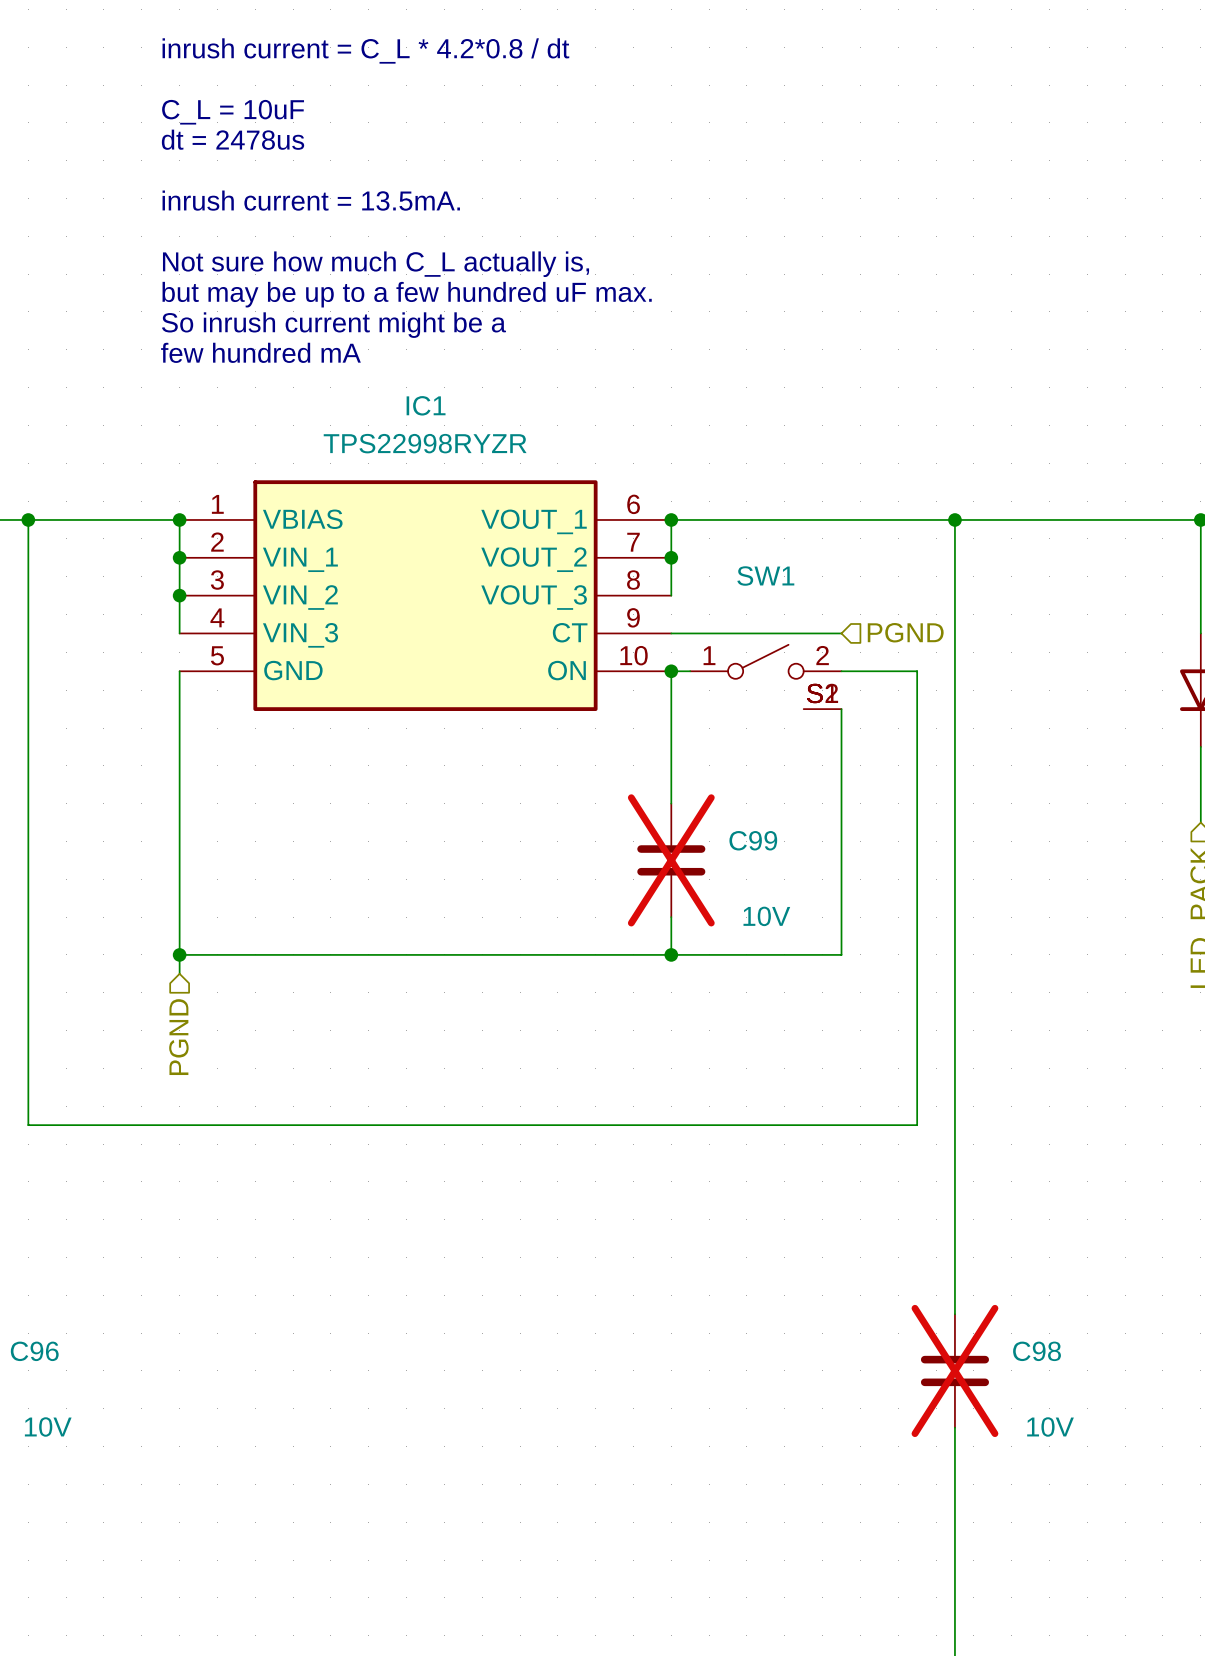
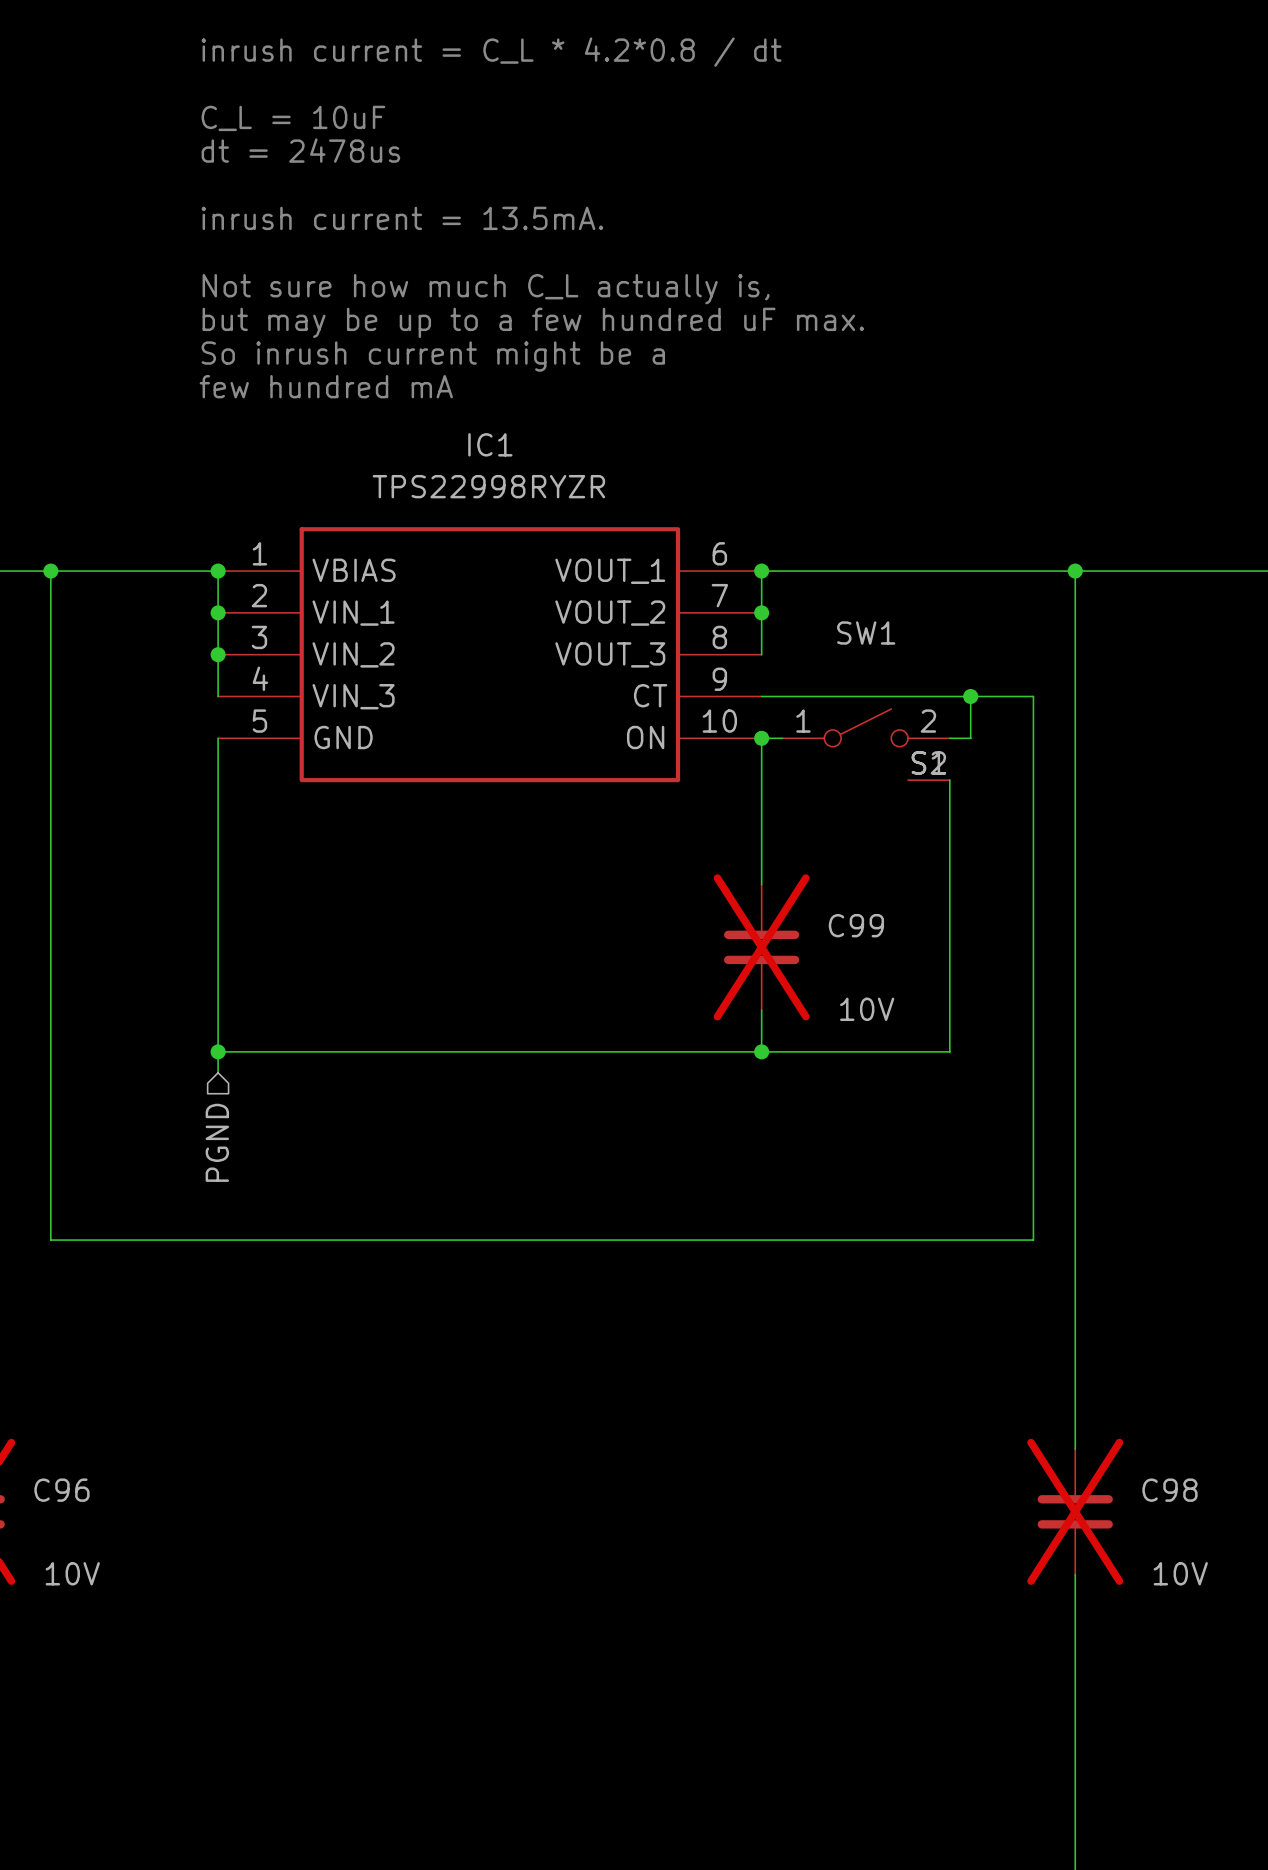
hierarchical label: PGND (905, 632) -> none
wire: none -> (970, 696) (970, 738)
junction: none -> (970, 696)
wire: (860, 671) (917, 671) -> (949, 696) (1033, 696) (1033, 738)

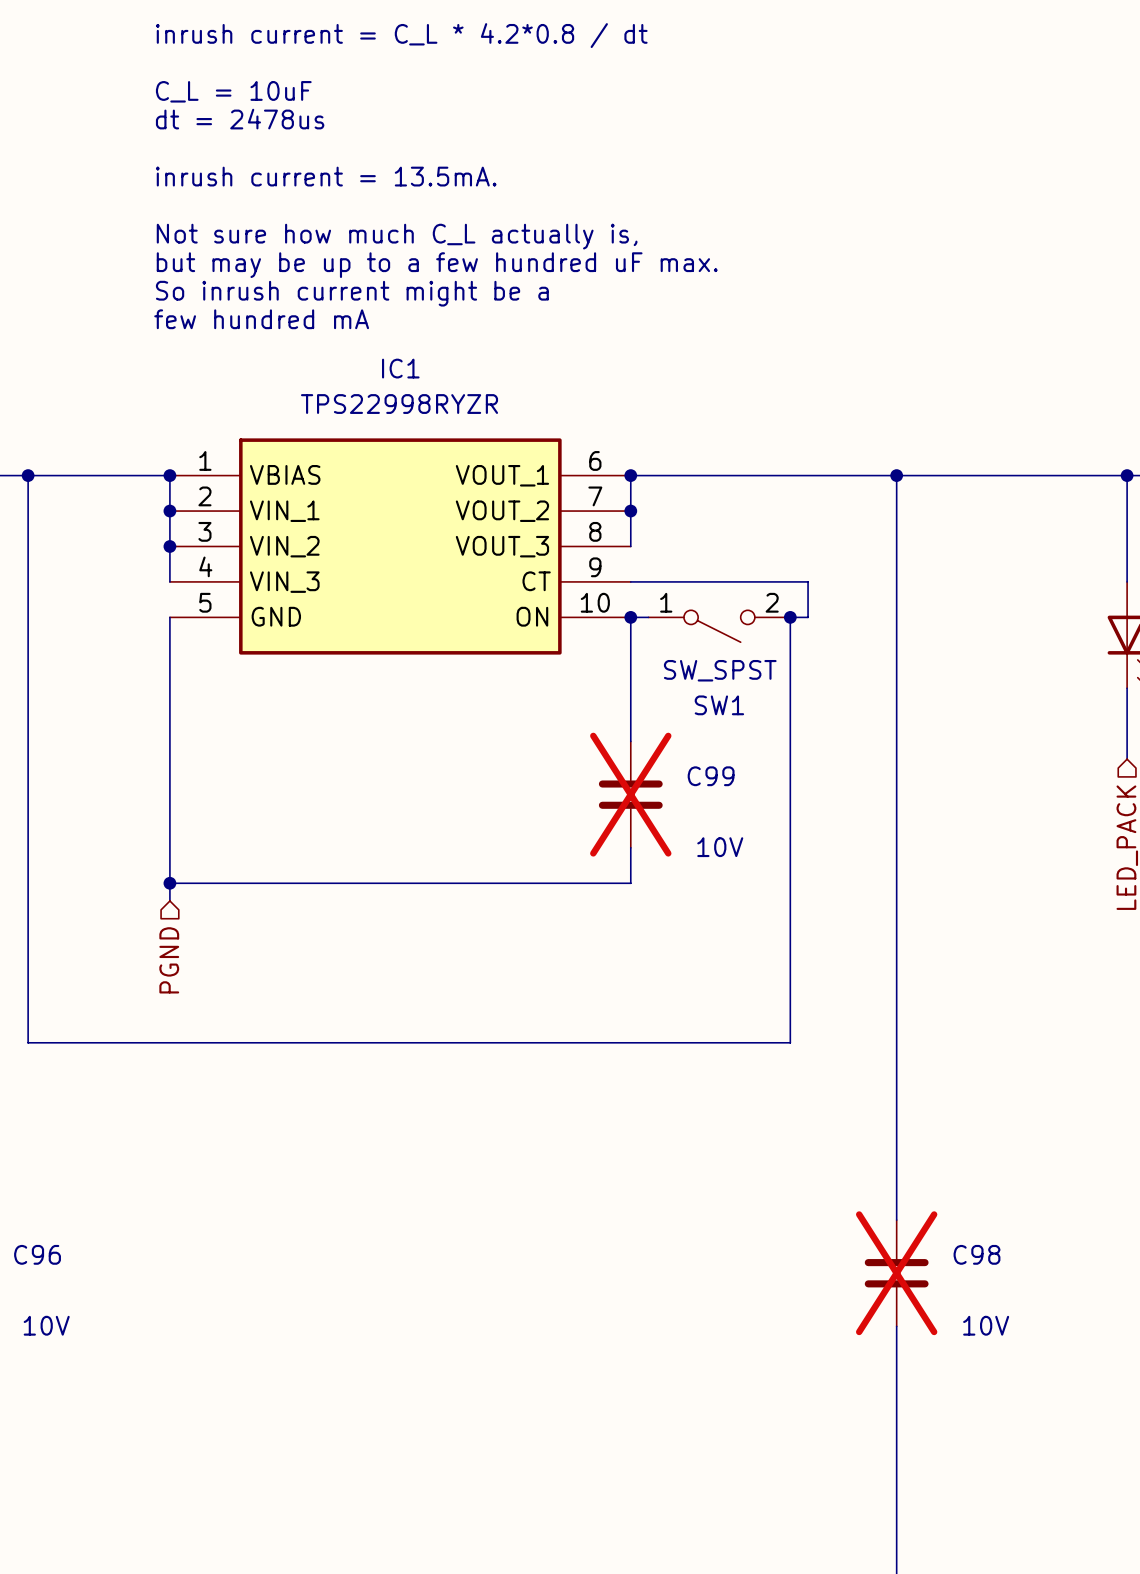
SW1 name position: SW1 (866, 633) -> SW1 (719, 705)
wire: (970, 696) (1033, 696) (1033, 1240) (949, 1240) -> none
junction position: (970, 696) -> (790, 617)
SW1 symbol: [782, 709, 950, 781] -> [648, 610, 791, 643]
wire: none -> (790, 617) (790, 652)
SW1 value: none -> SW_SPST (720, 670)
wire: (761, 1051) (949, 1051) -> (790, 1042) (790, 883)
junction: (761, 1051) -> none

